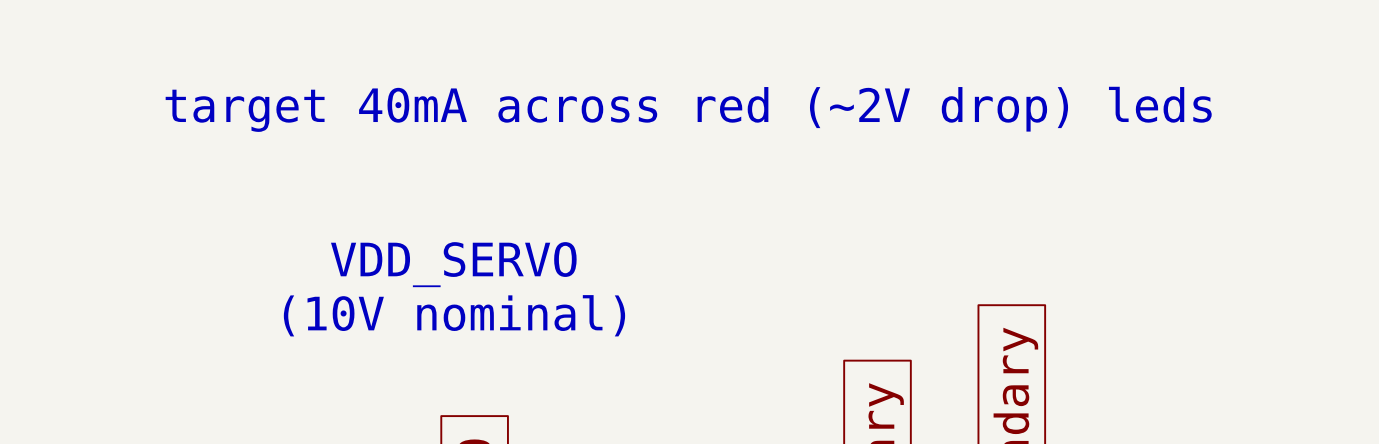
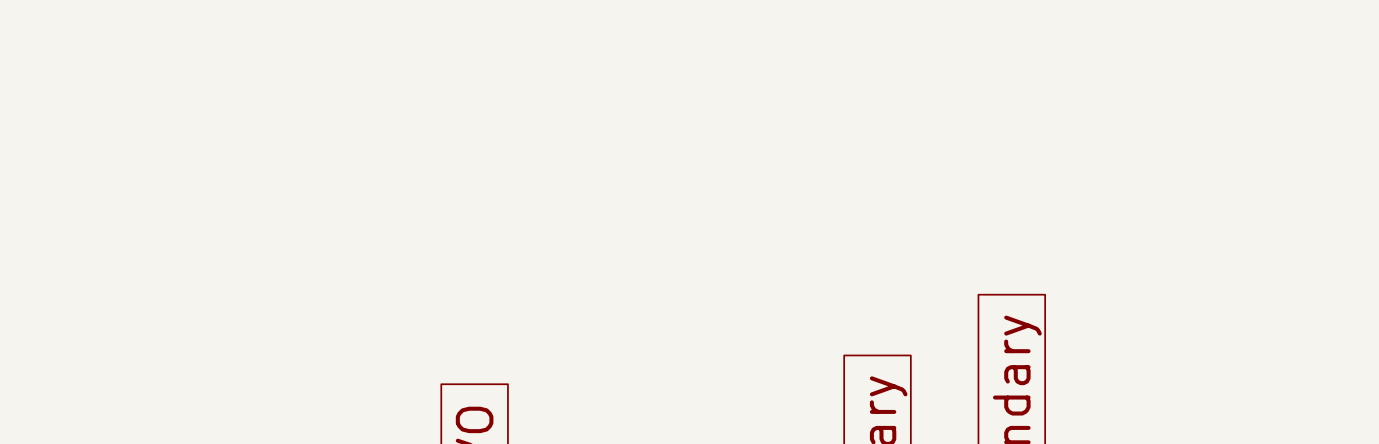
text: target 40mA across red (~2V drop) leds (688, 109) -> none
text: VDD_SERVO (453, 264) -> none
text: (10V nominal) (454, 315) -> none

